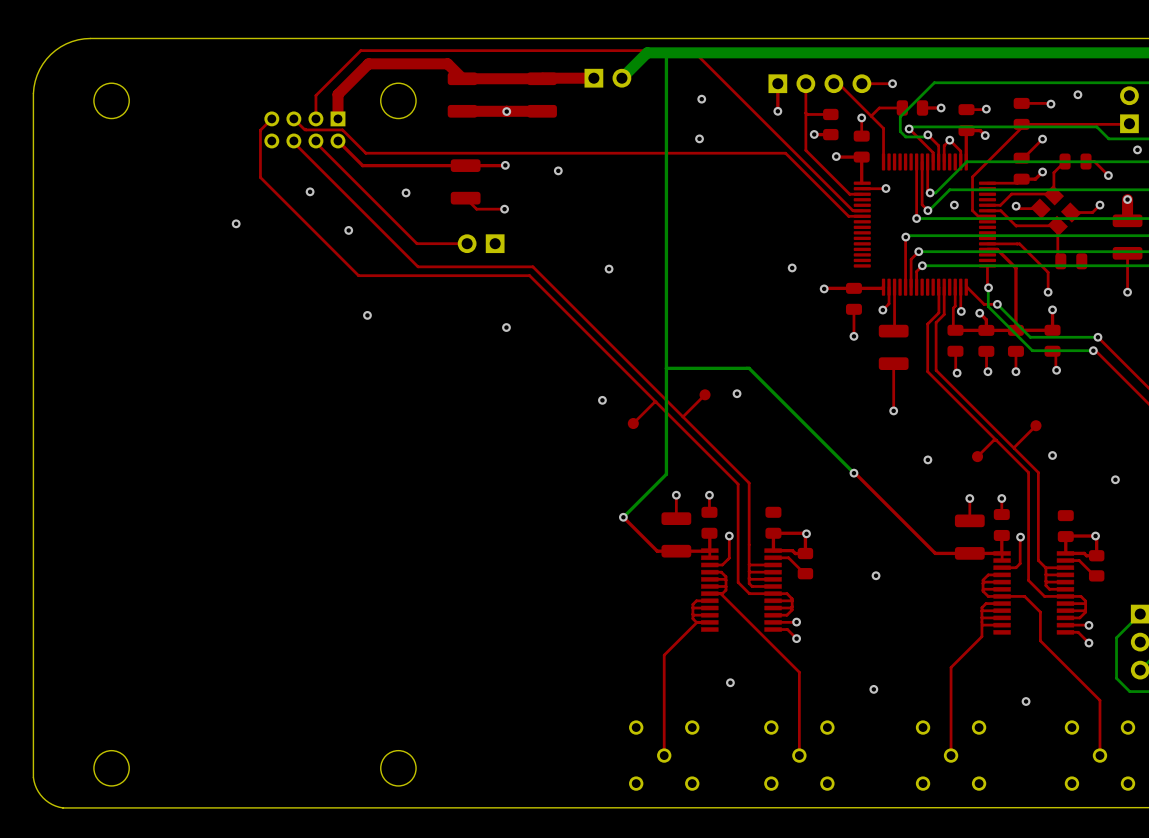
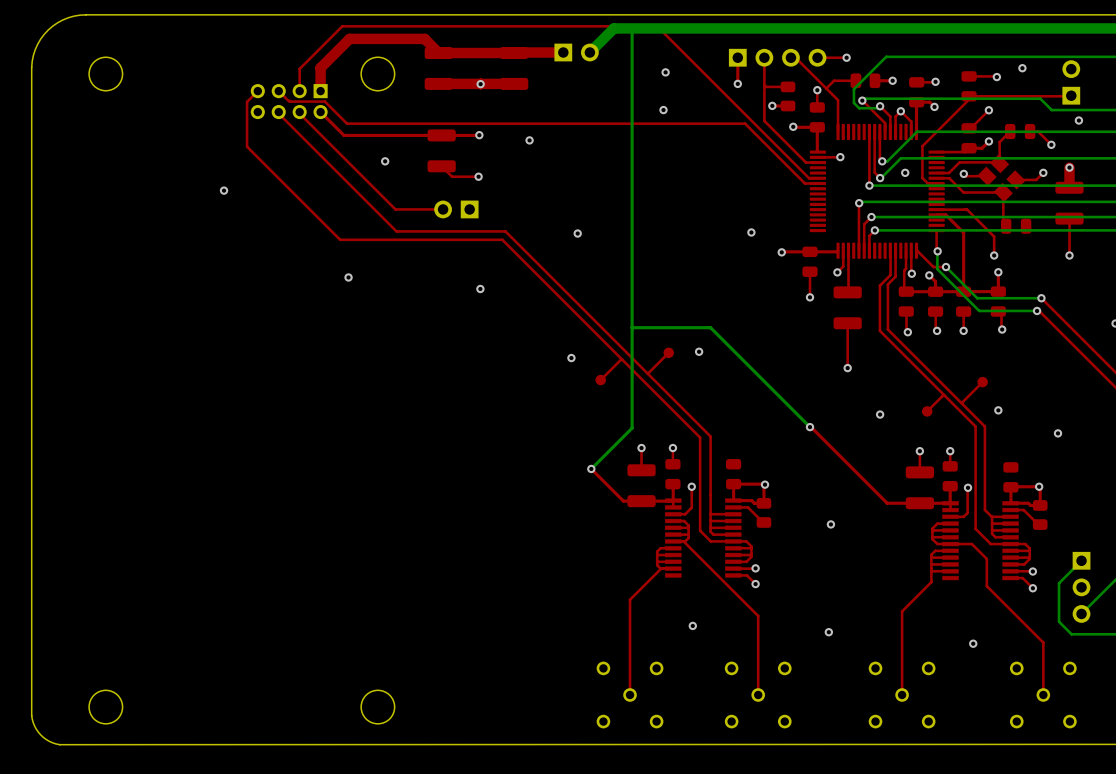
via: (310, 191) -> none
via: (348, 230) -> none

